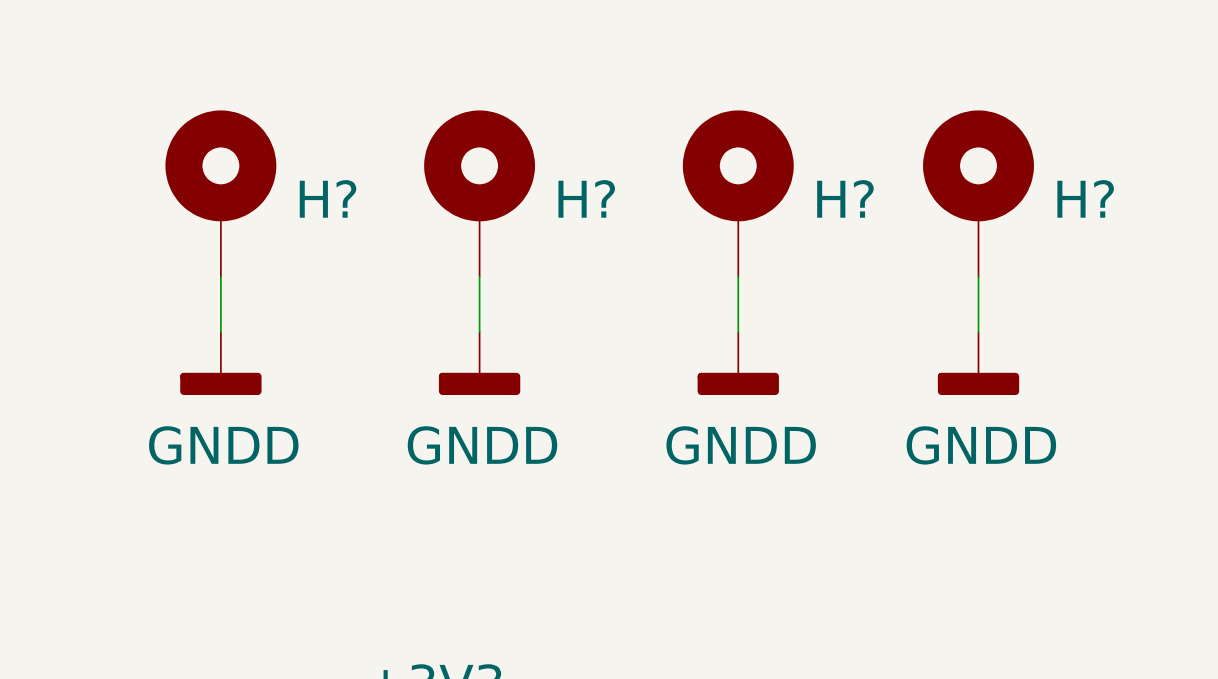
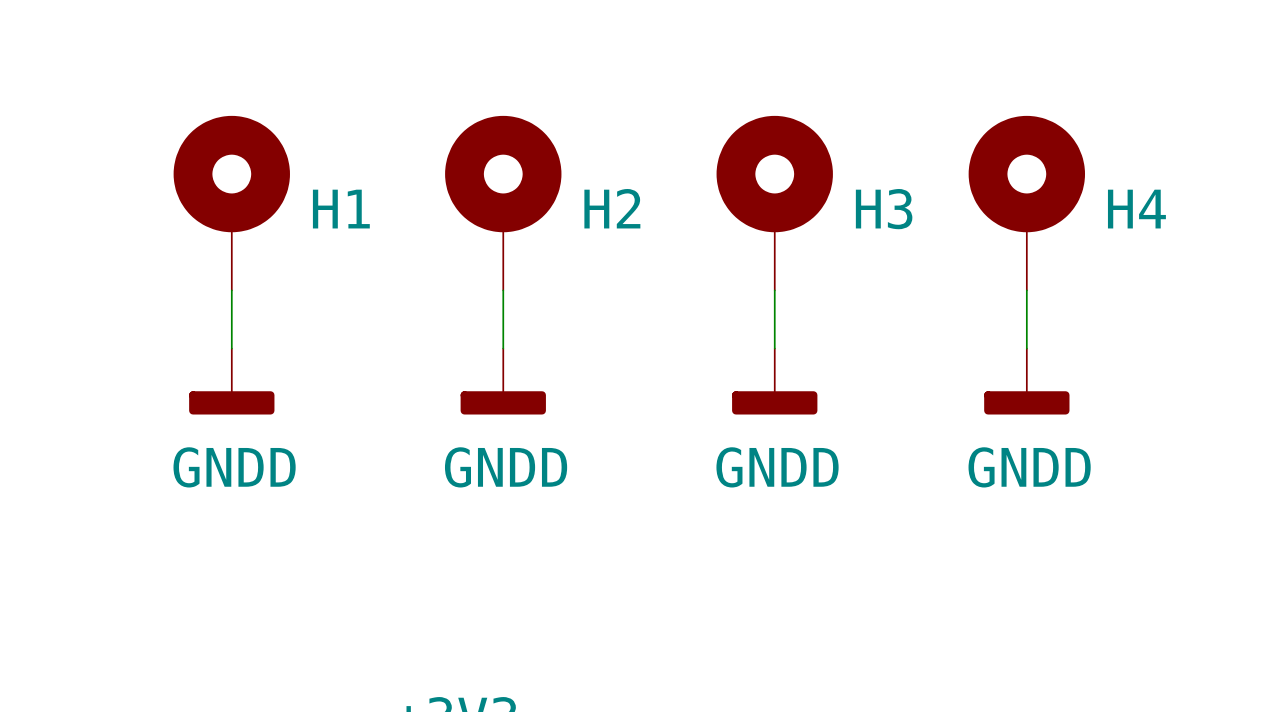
H? name: H? (328, 198) -> H1 (341, 209)
H? name: H? (586, 198) -> H2 (612, 208)
H? name: H? (845, 198) -> H3 (884, 209)
H? name: H? (1085, 198) -> H4 (1136, 209)

